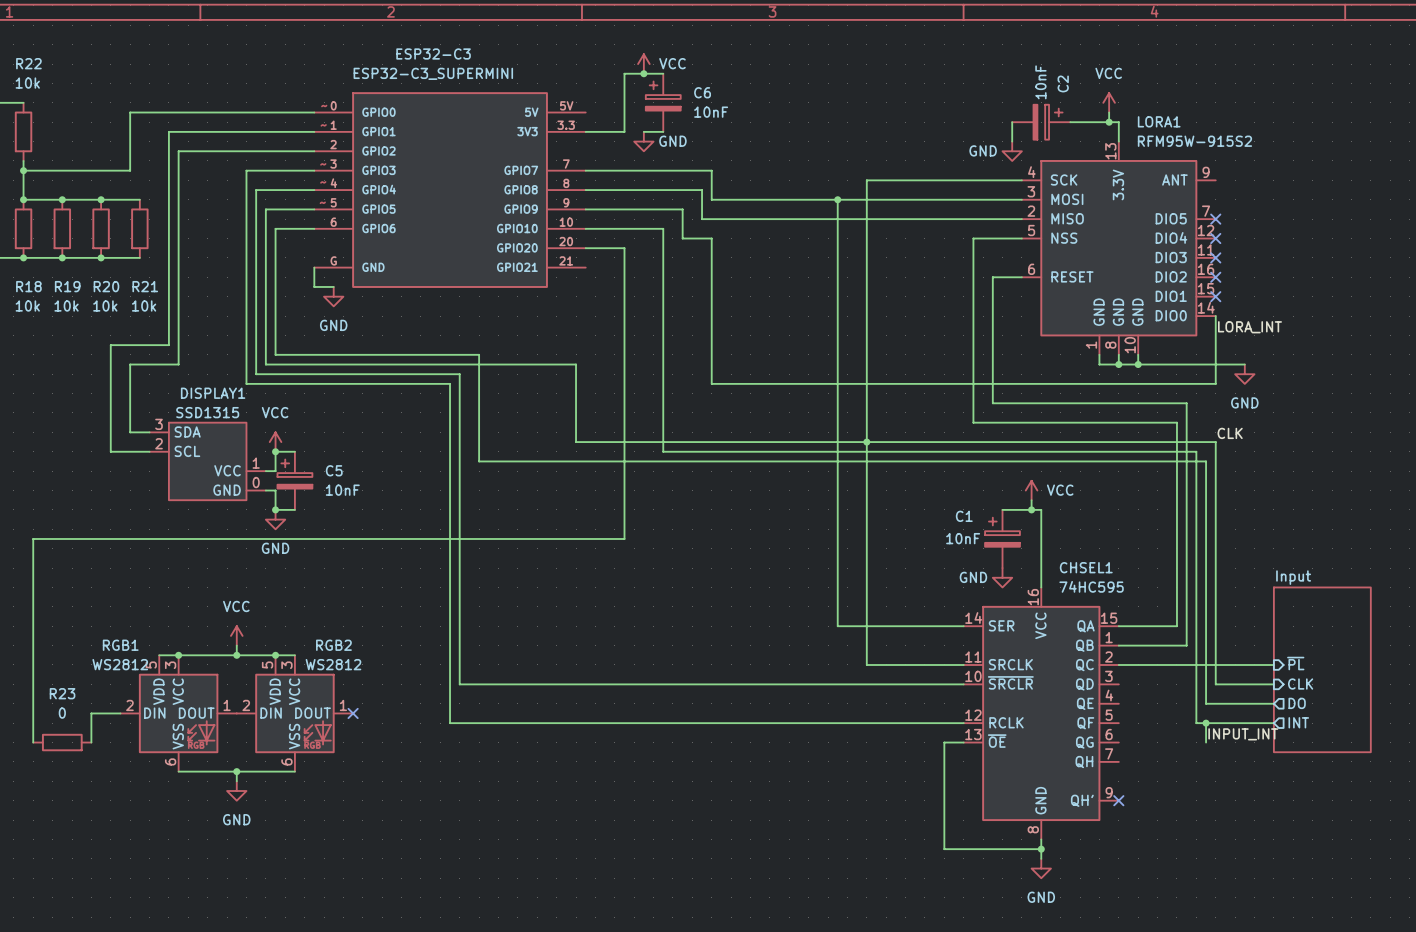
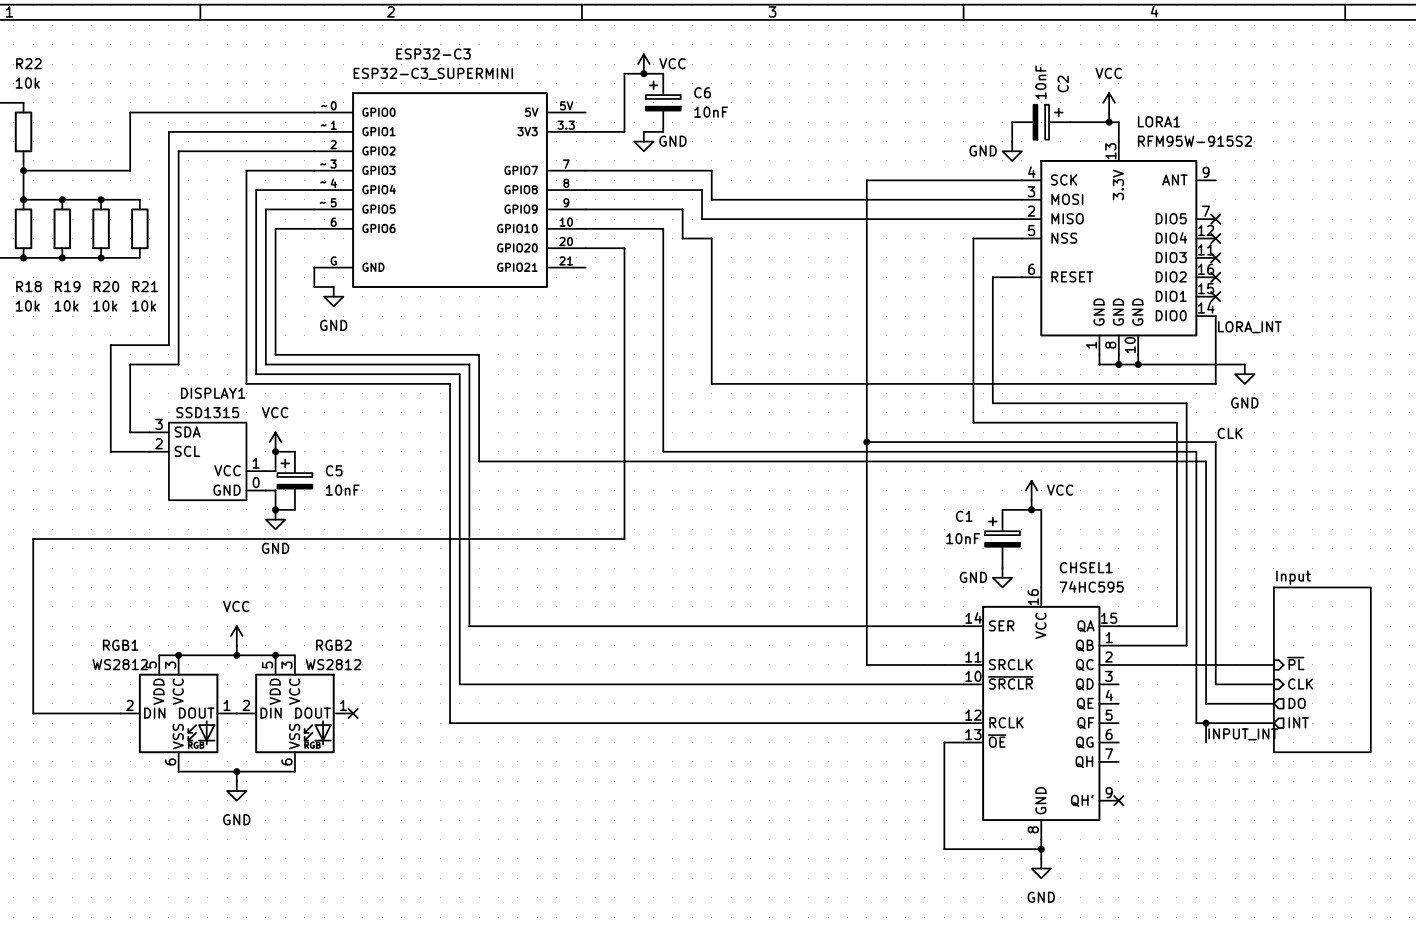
wire: (837, 199) (837, 626) -> none
junction: (837, 199) -> none
wire: (469, 364) (576, 364) (576, 442) (866, 442) -> (469, 364) (469, 626) (837, 626)
wire: (33, 713) (33, 742) -> (33, 713) (91, 713)
wire: (91, 713) (91, 742) -> none
R23: 0 (62, 742) -> none

